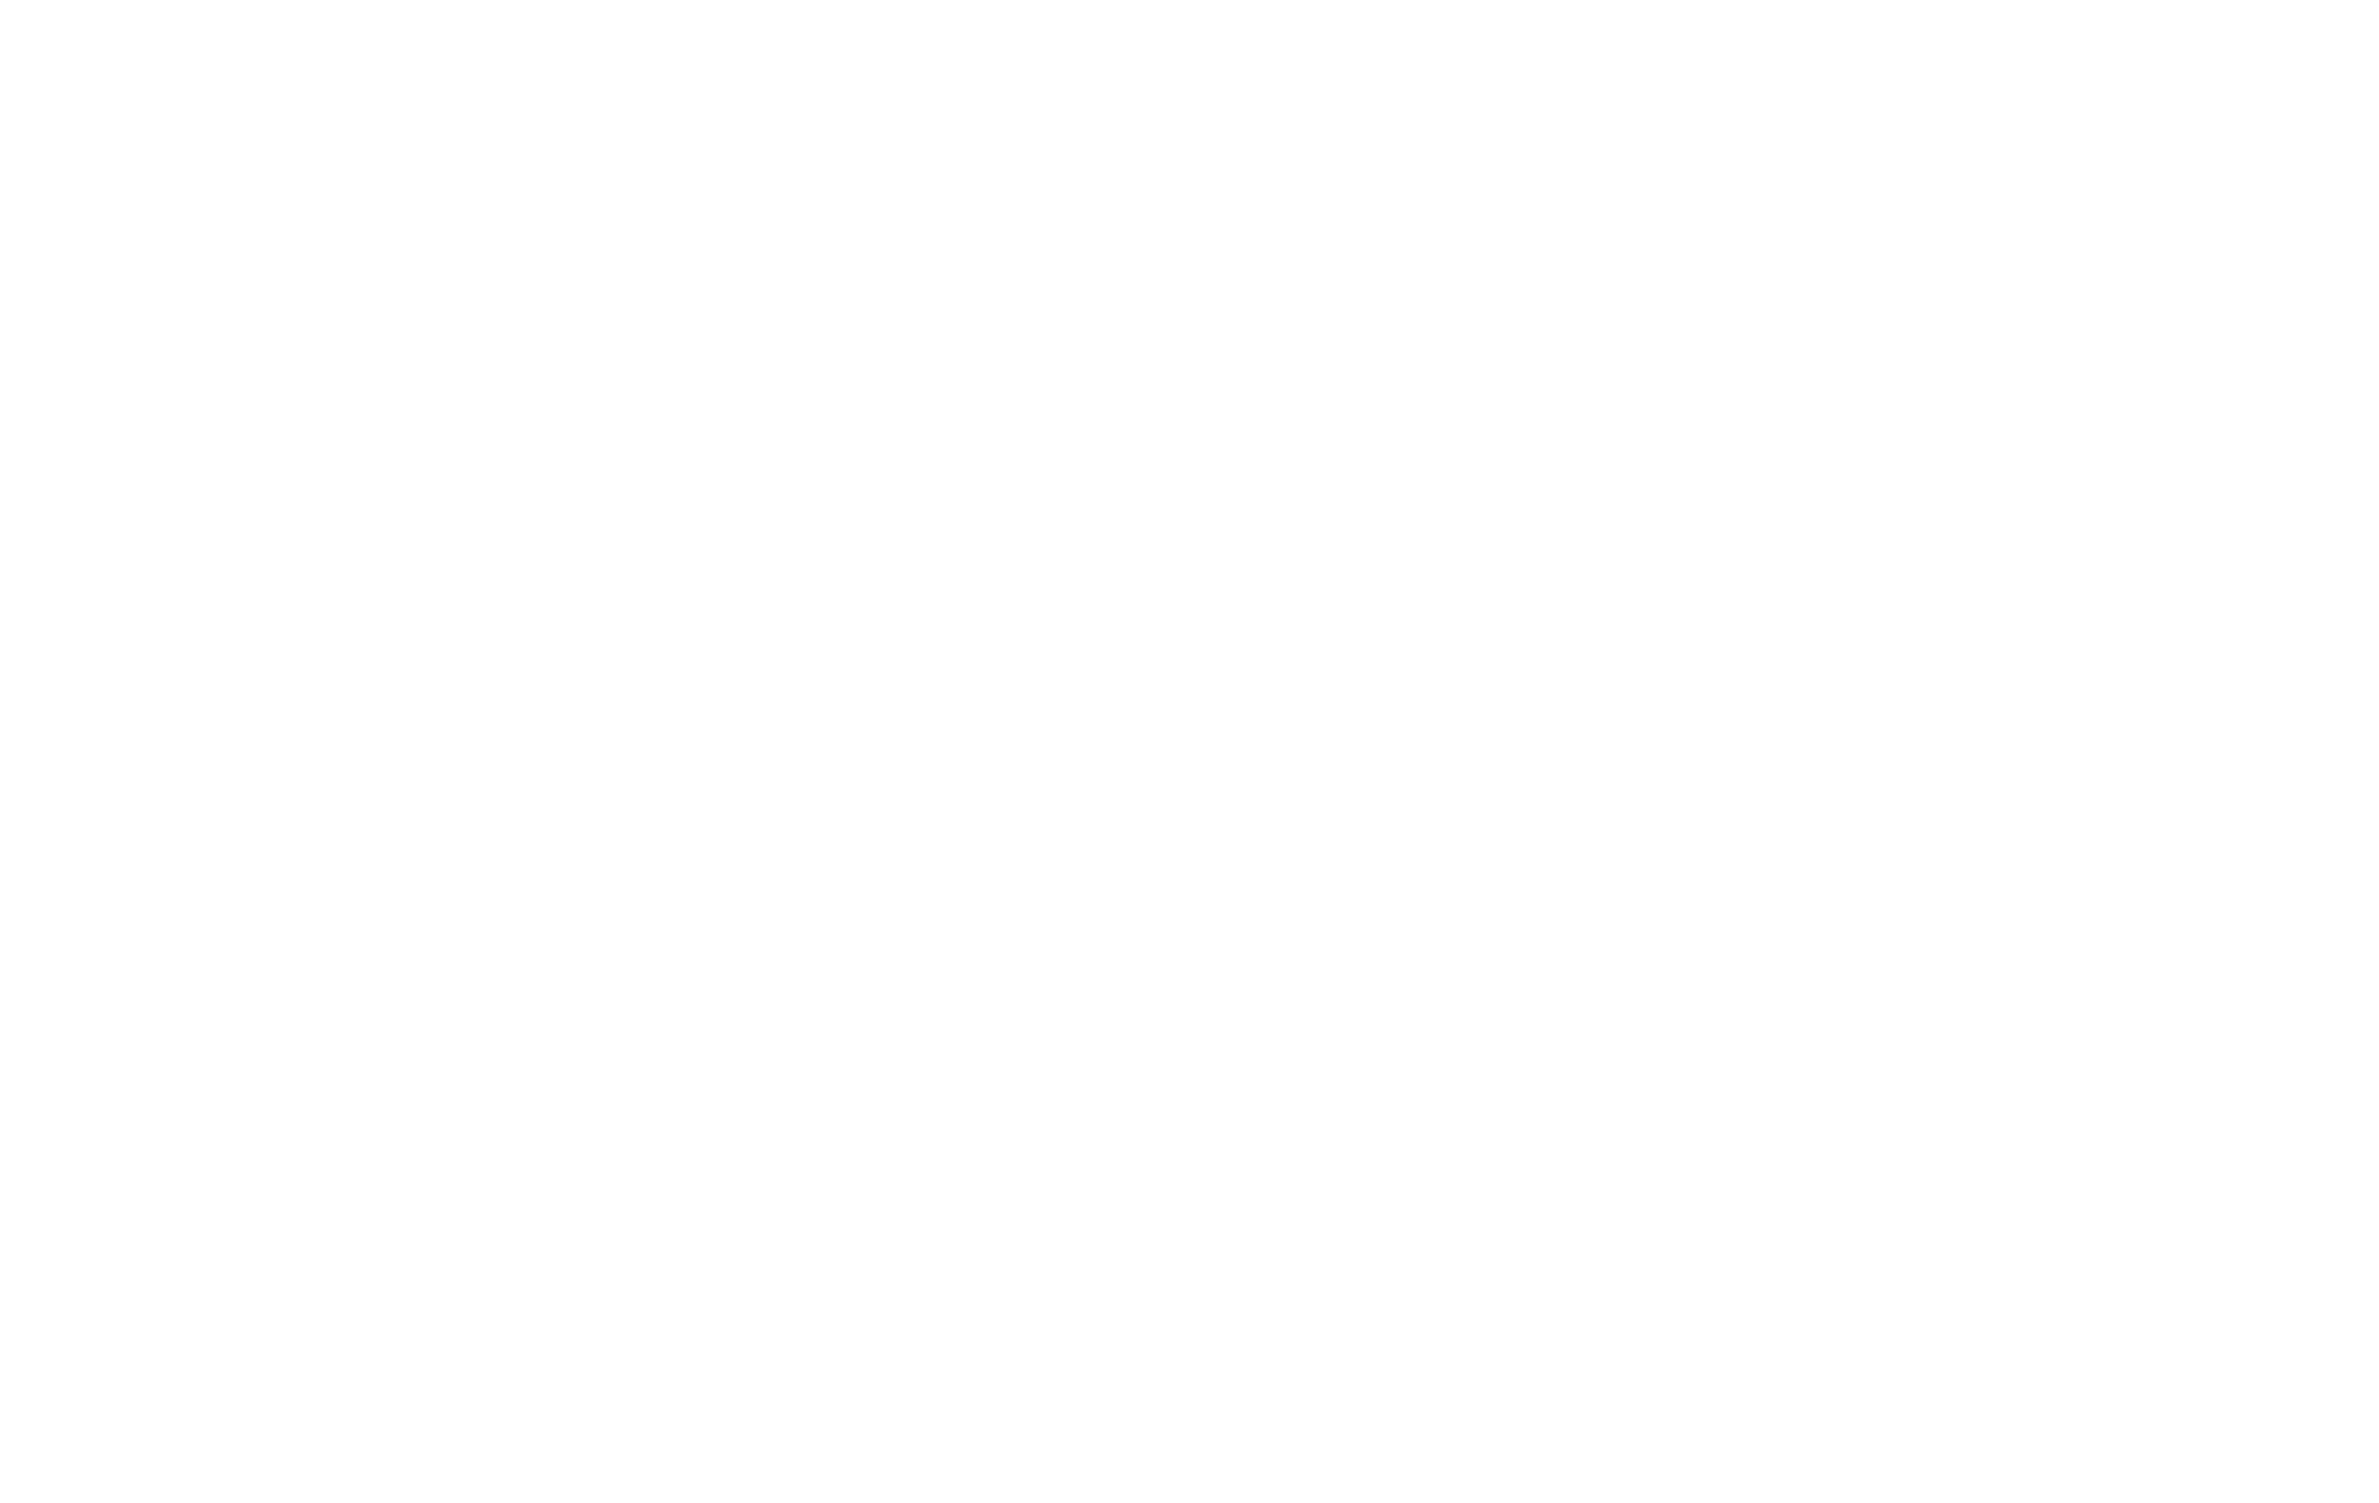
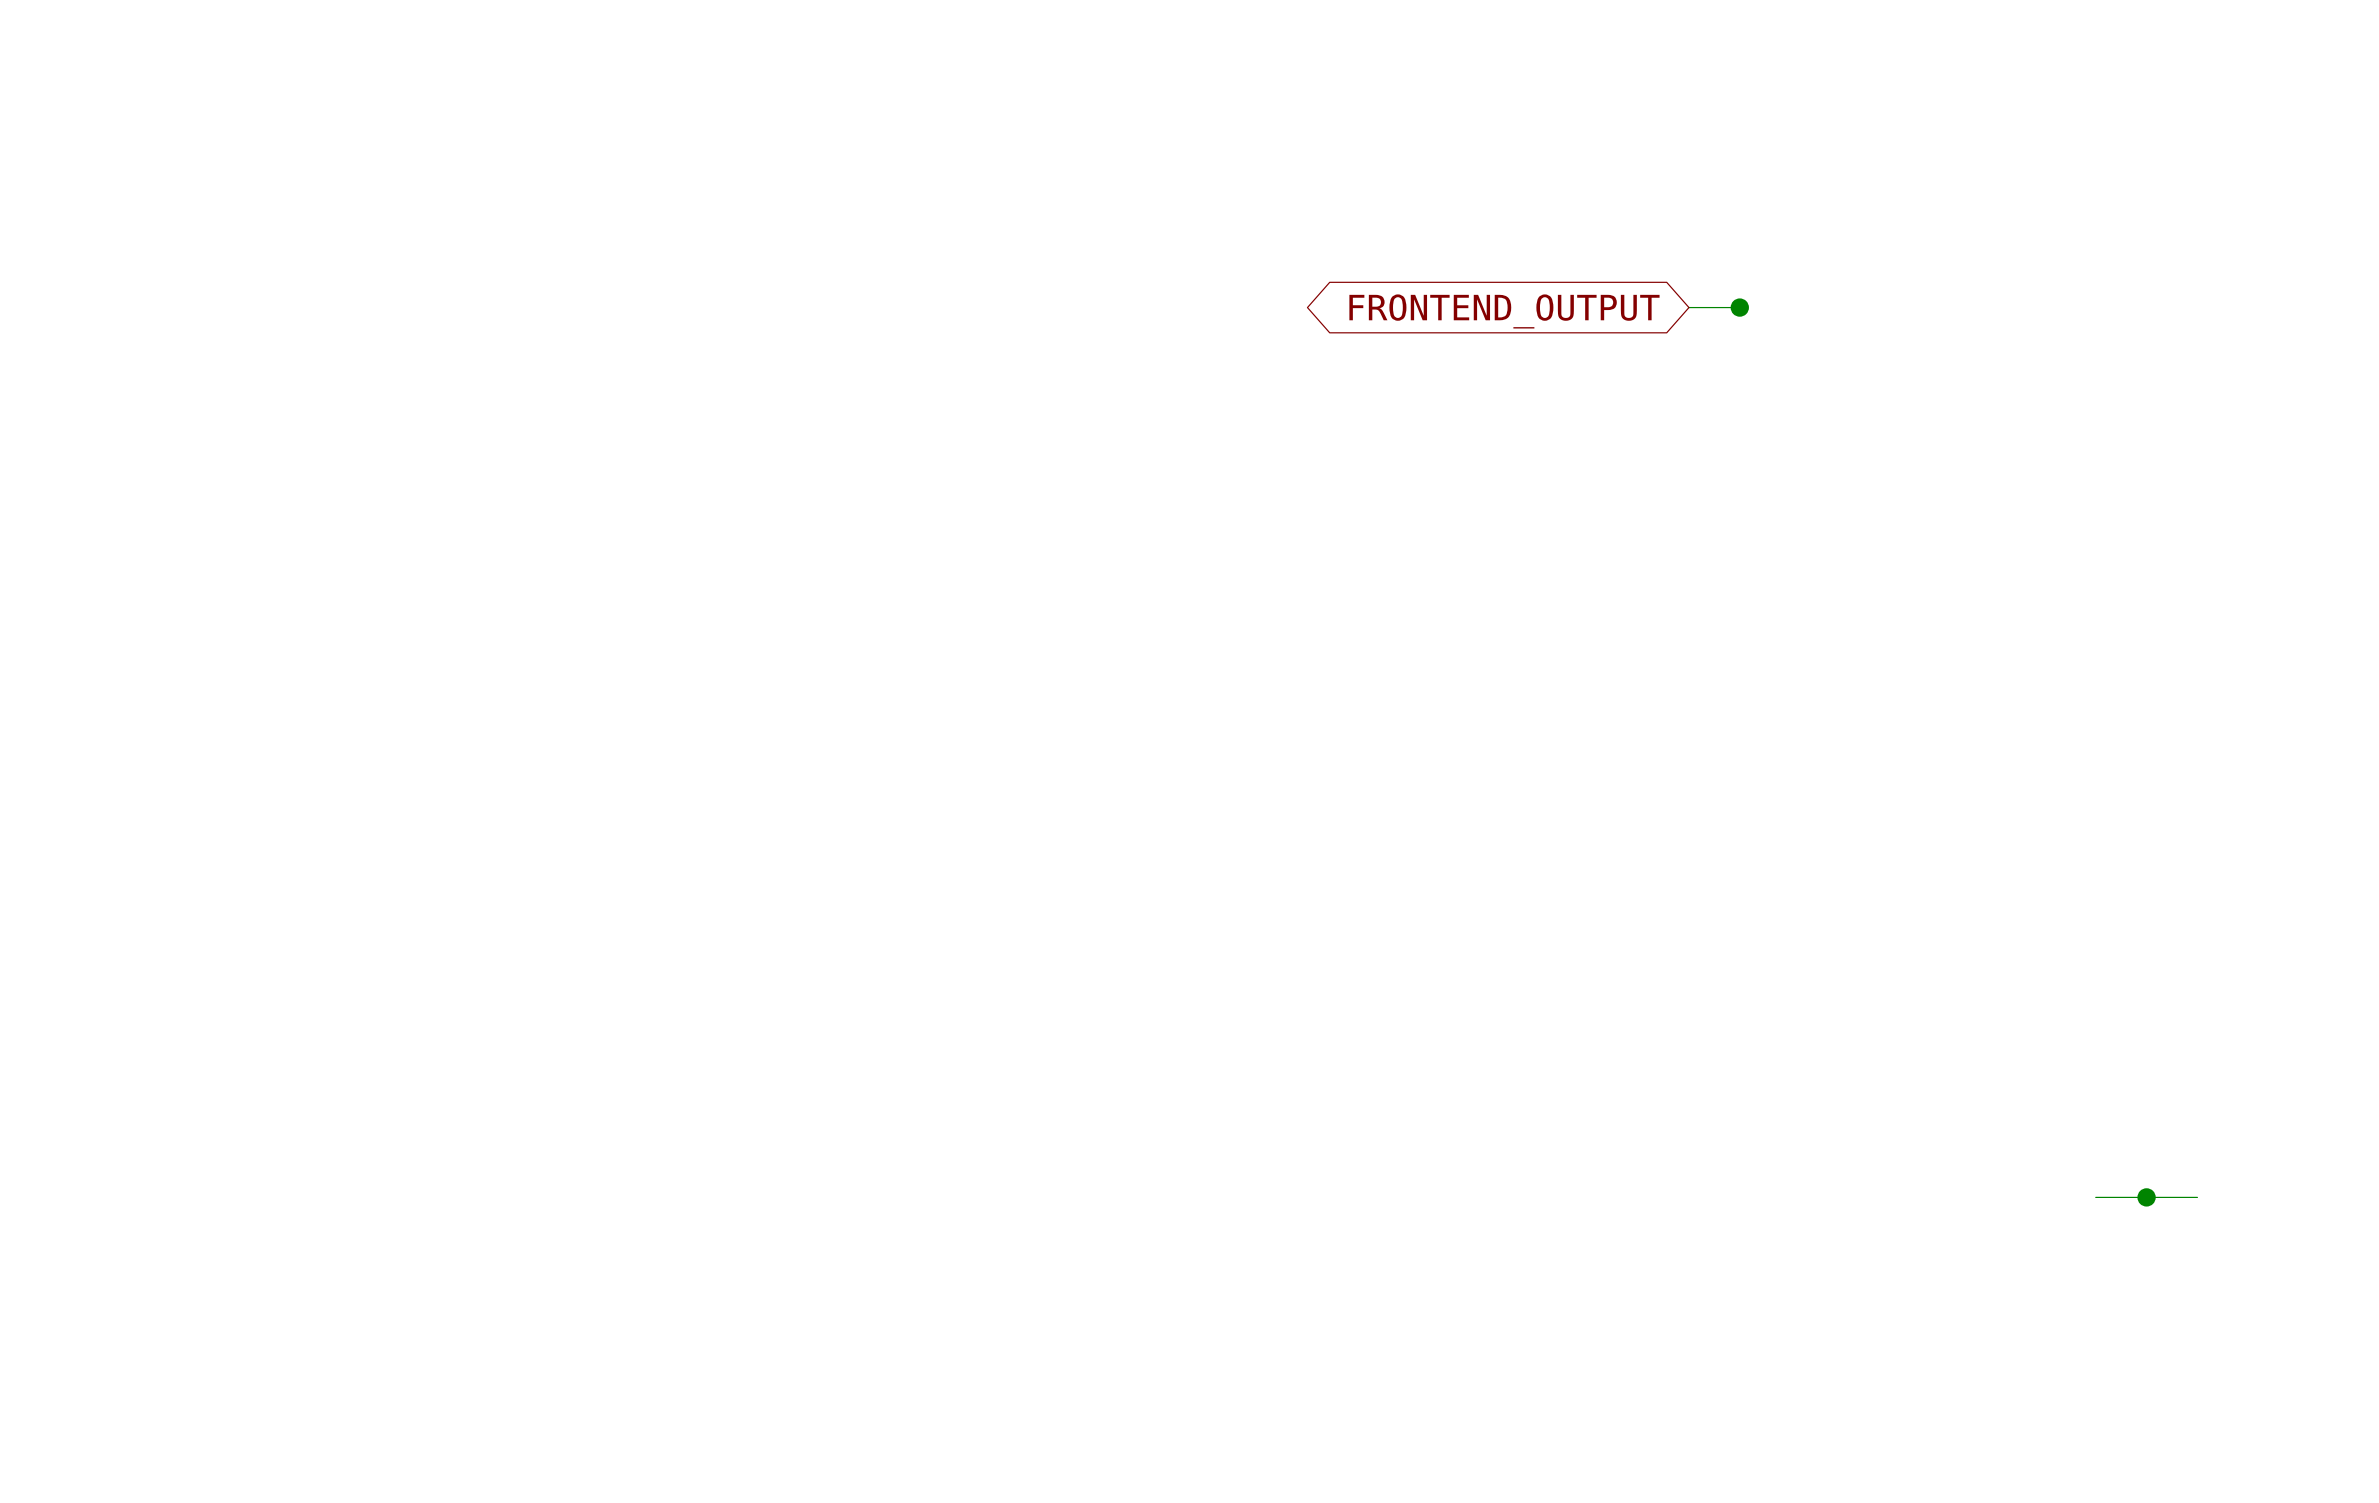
wire: none -> (1688, 307) (1739, 307)
junction: none -> (1739, 307)
global label: none -> FRONTEND_OUTPUT (1504, 311)
wire: none -> (2095, 1197) (2197, 1197)
junction: none -> (2146, 1197)

